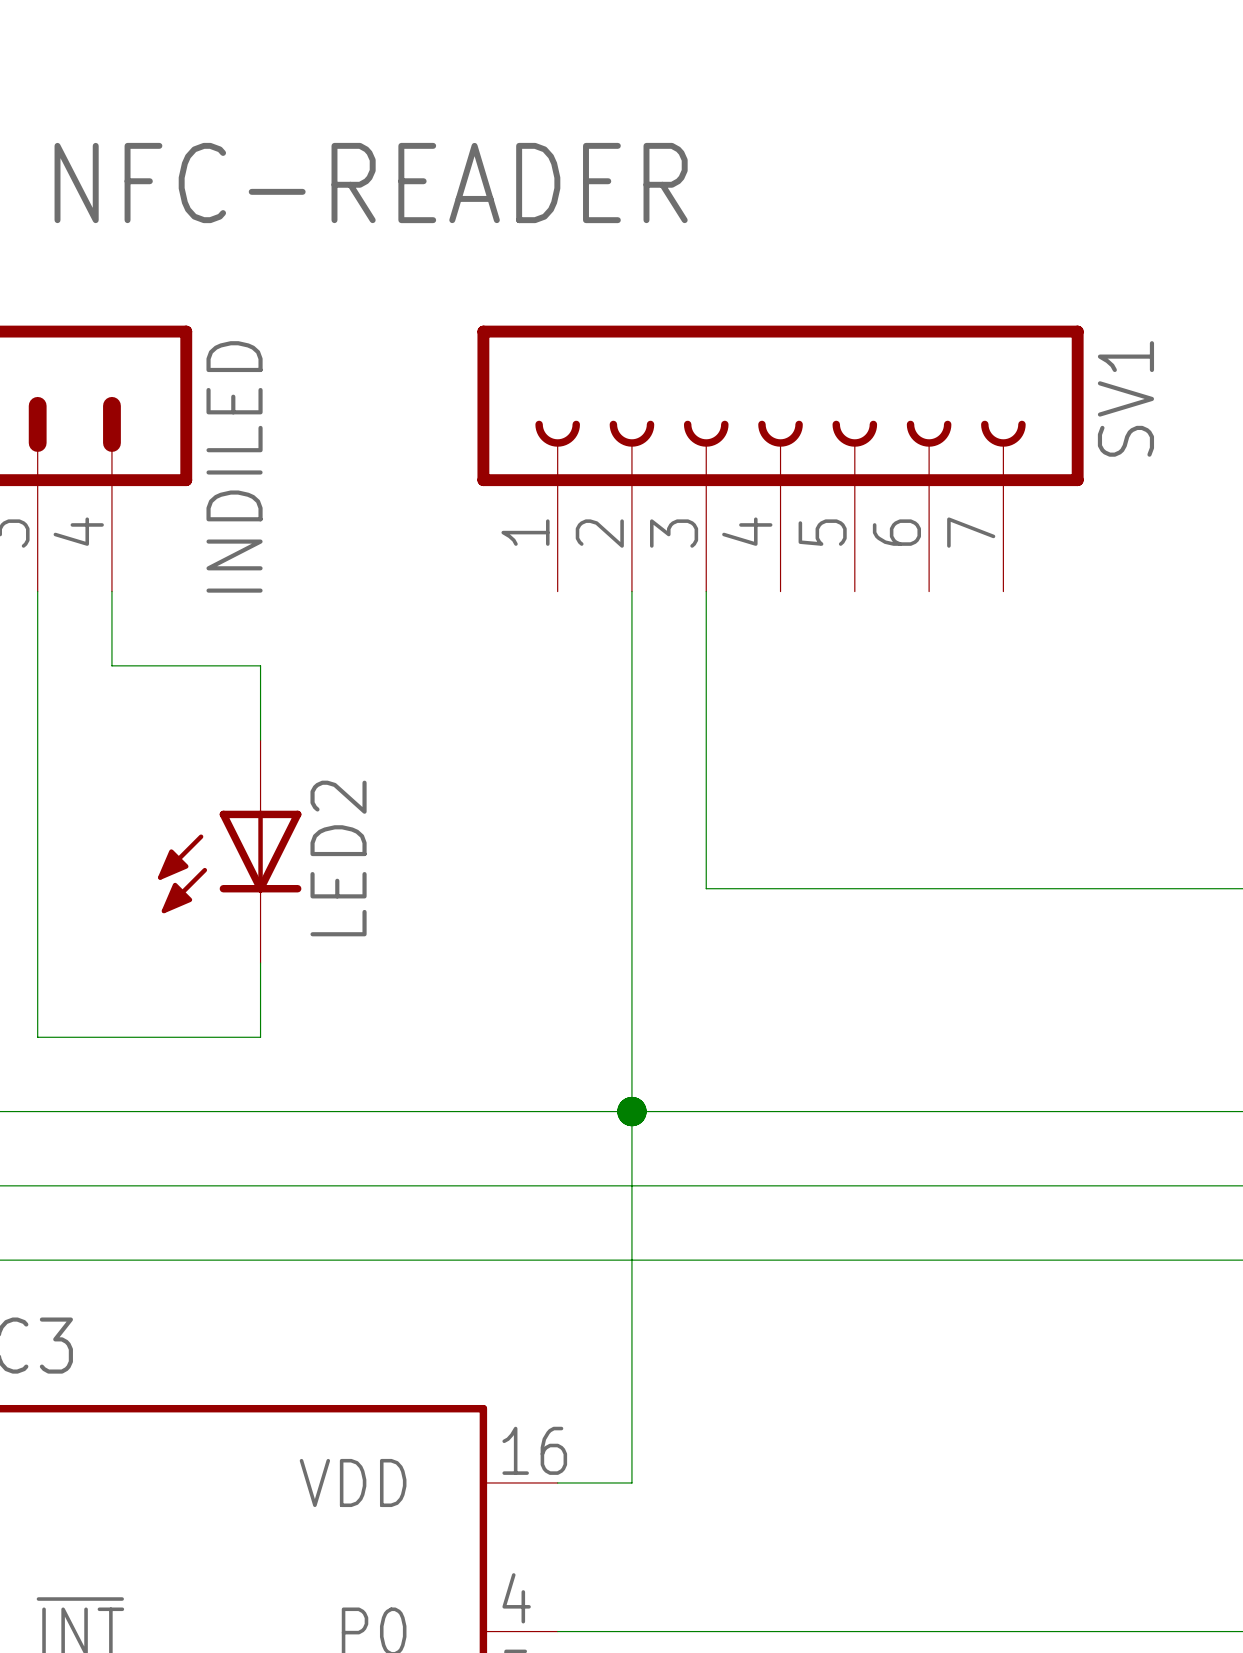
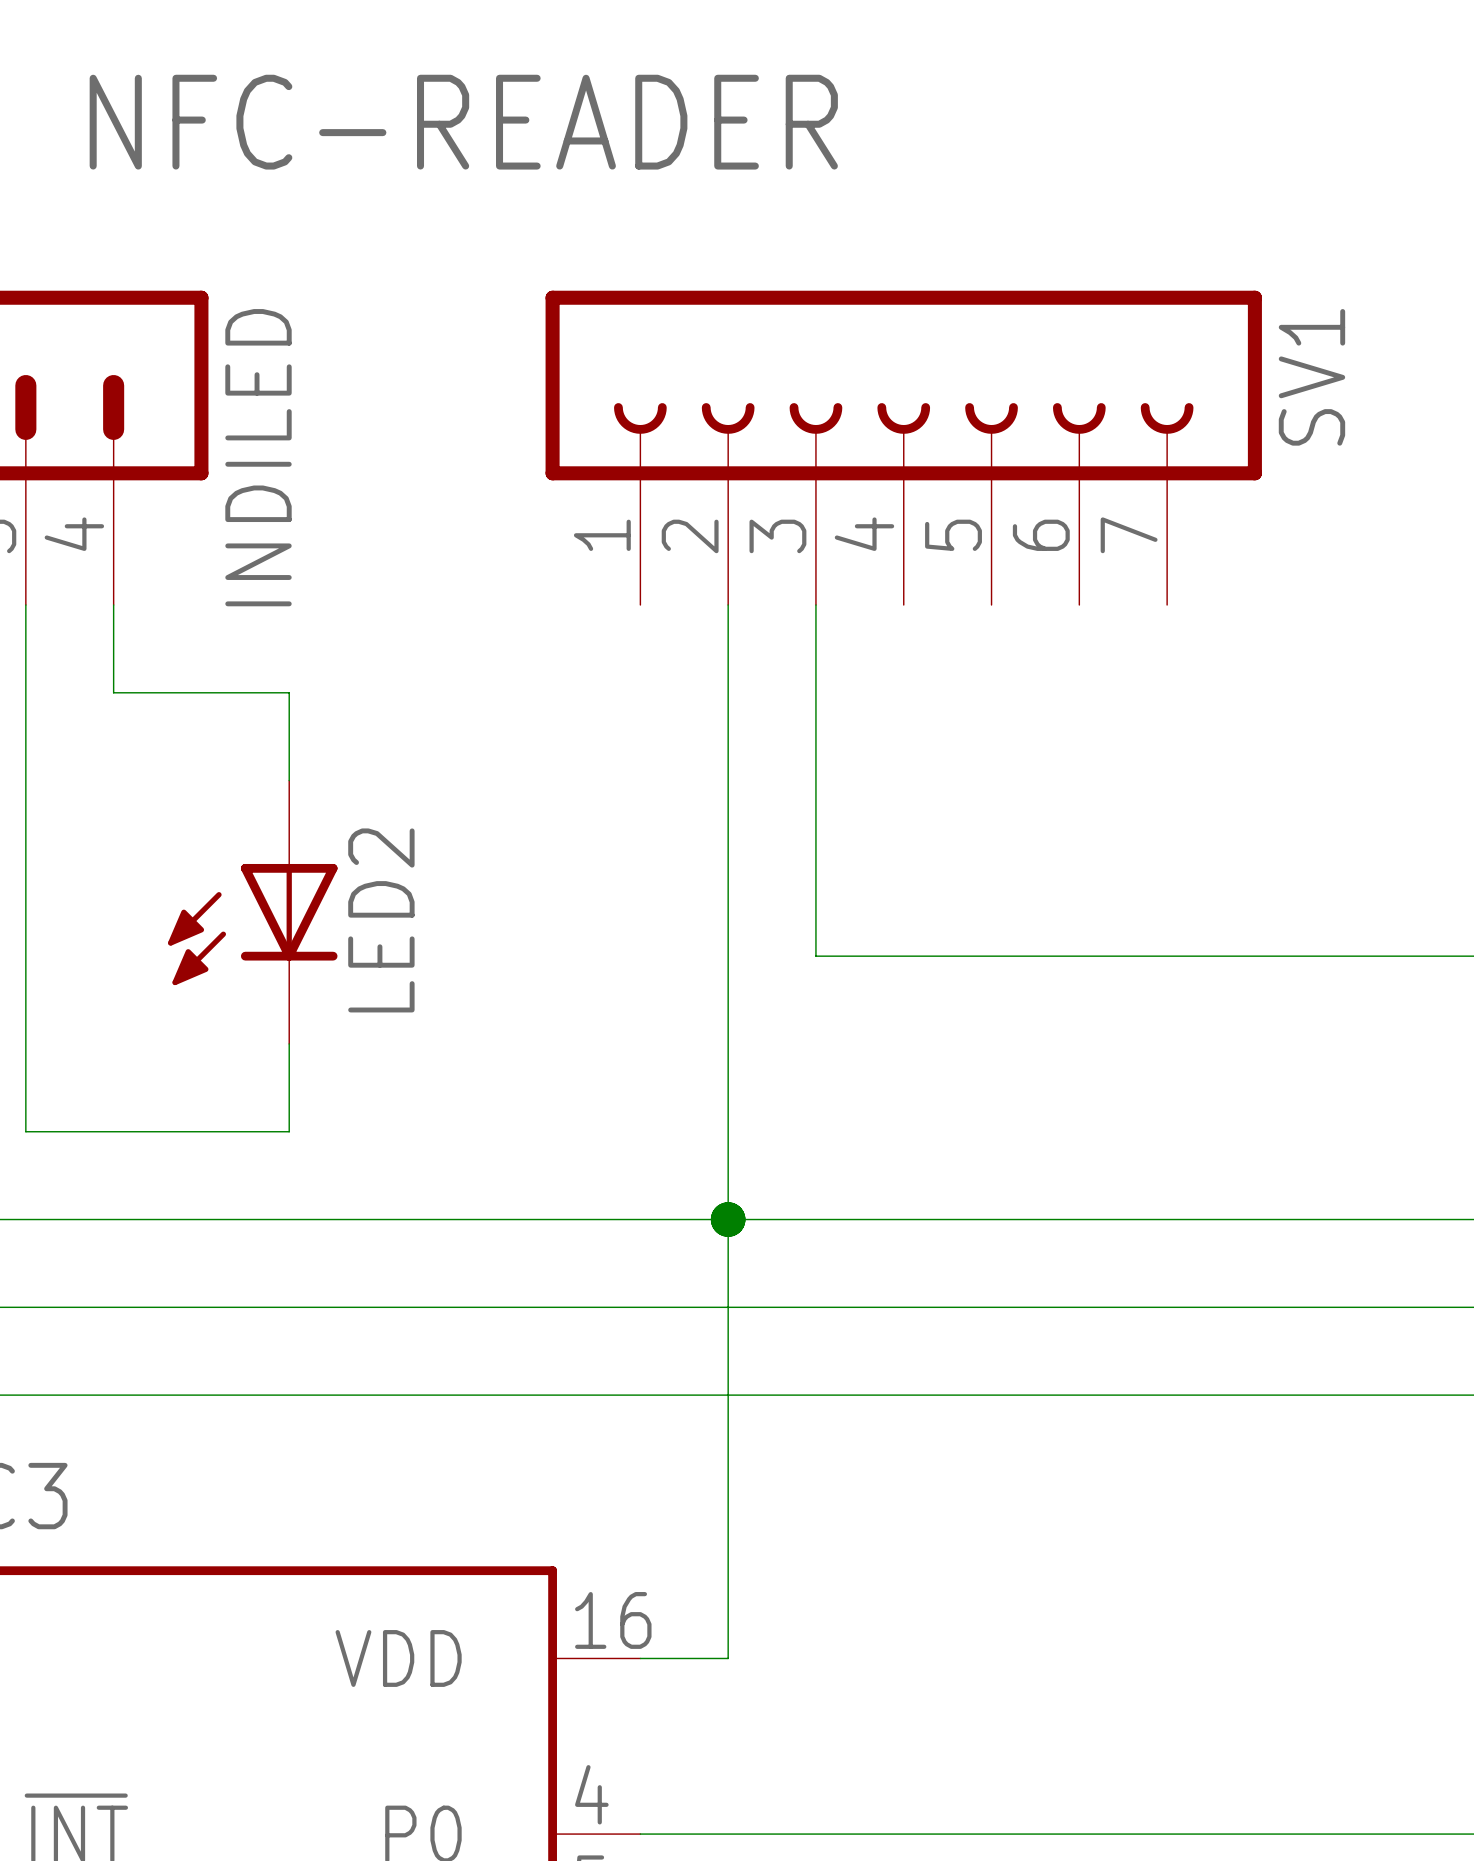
text position: NFC-READER (371, 183) -> NFC-READER (463, 122)

